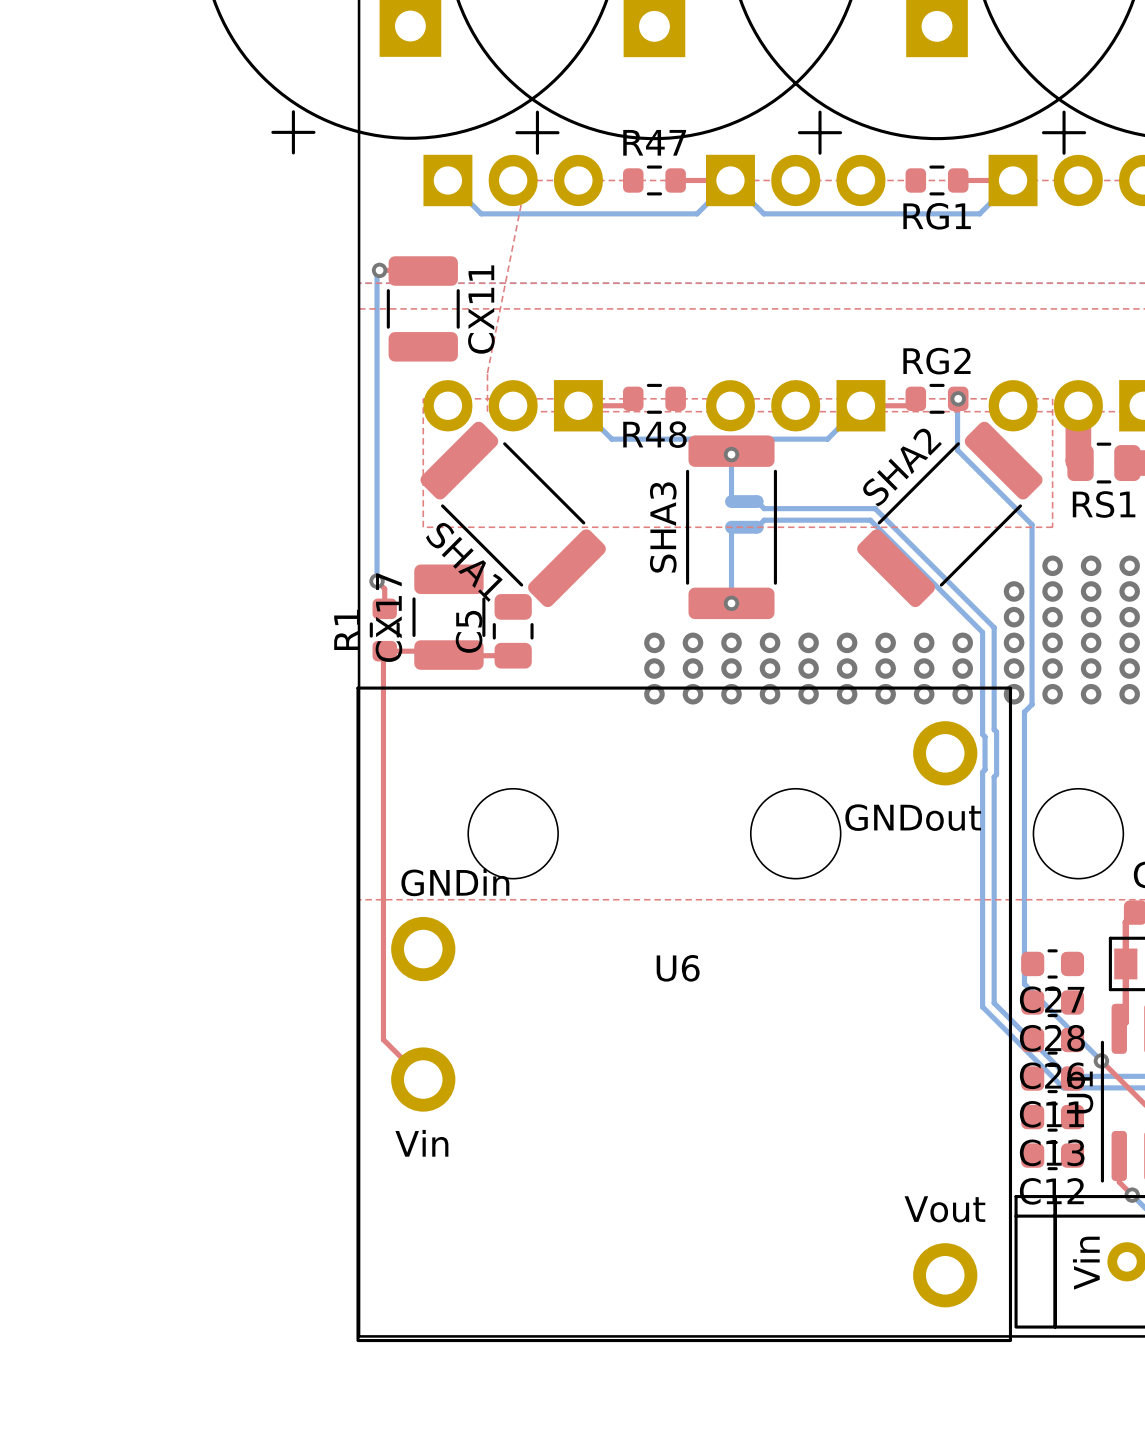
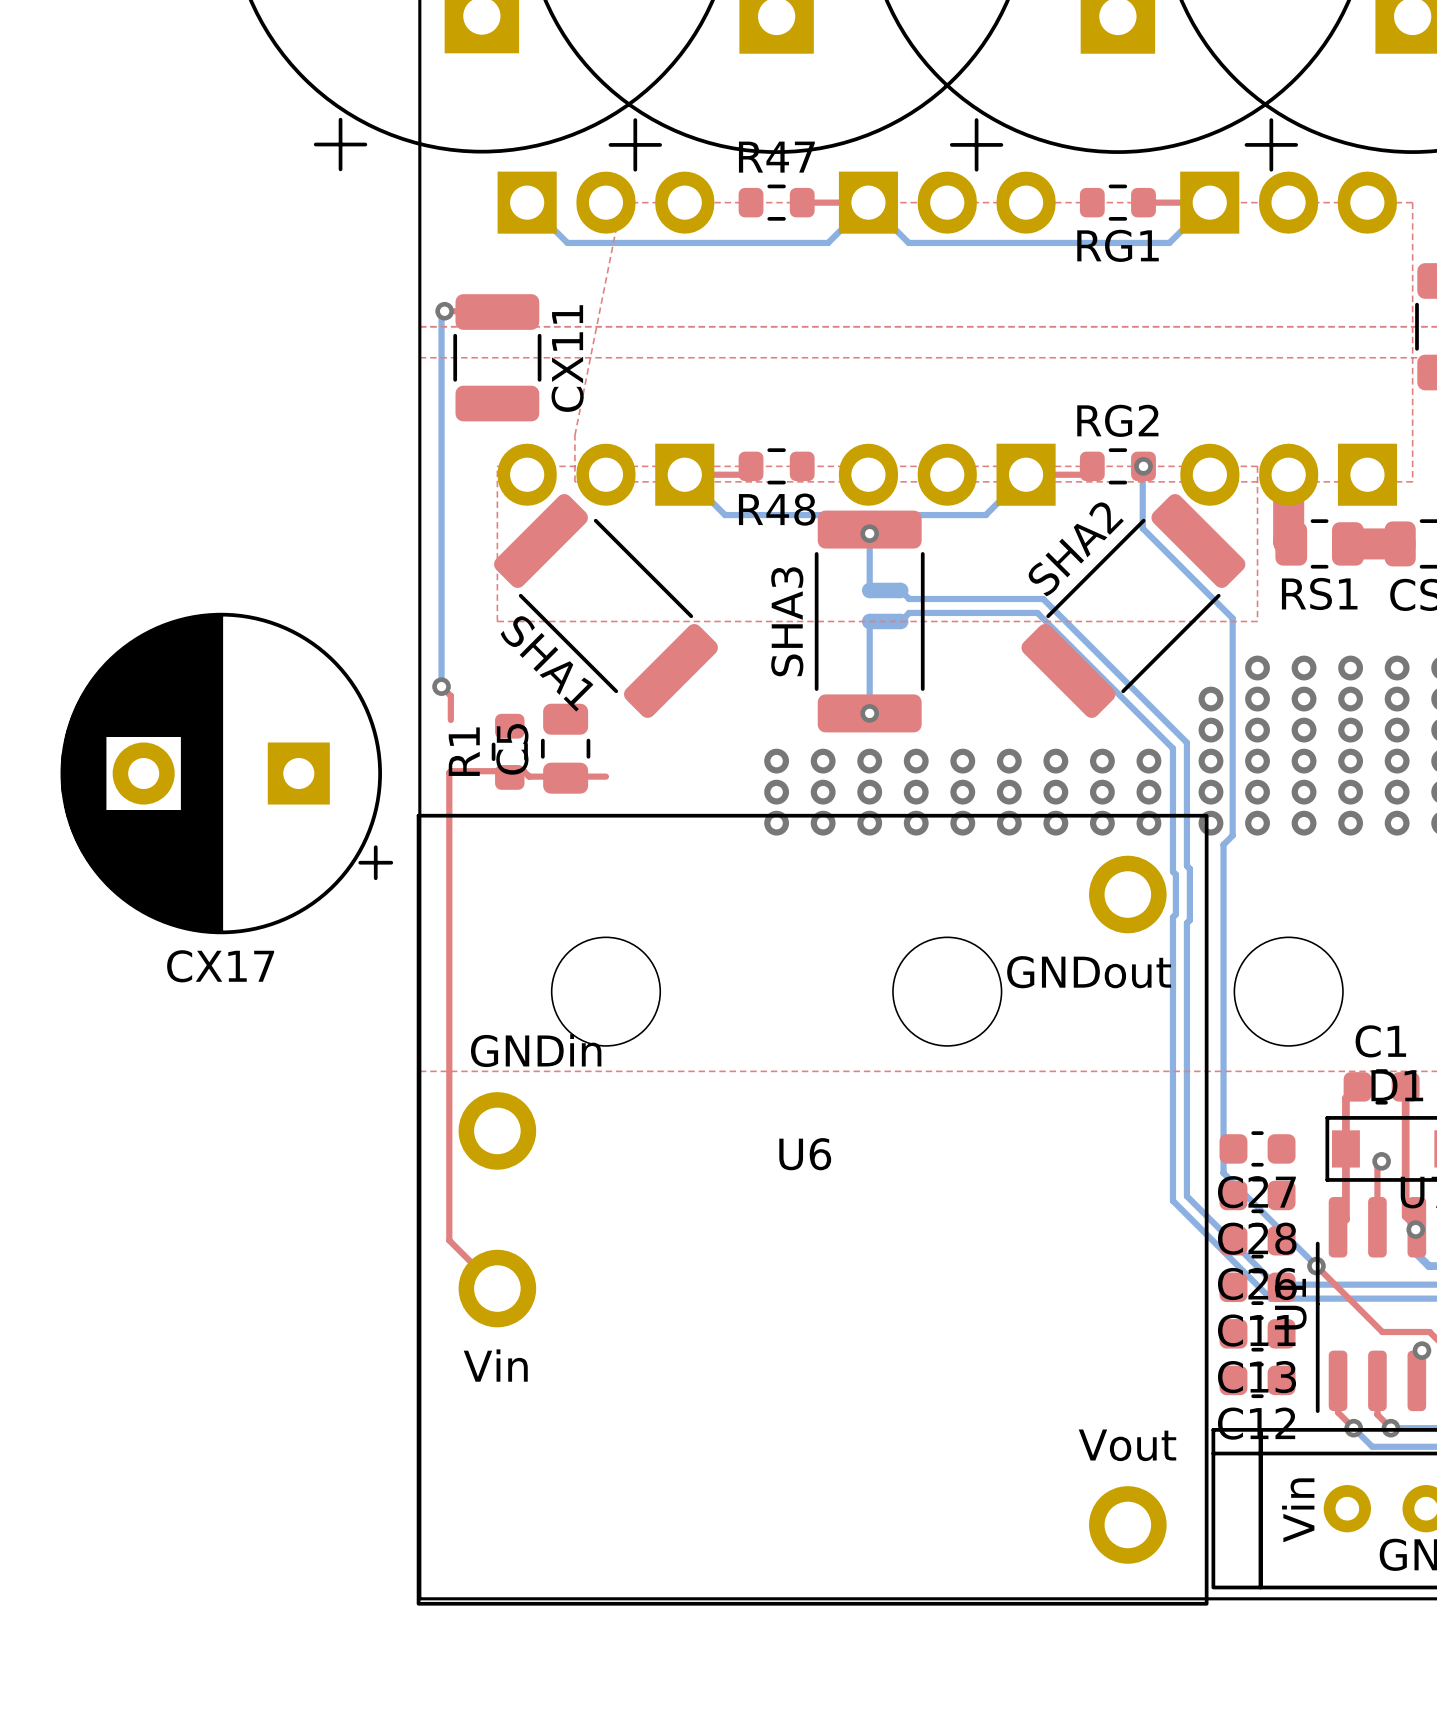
CX17 footprint: [412, 564, 486, 670] -> [60, 612, 394, 935]
CX17 name position: CX17 (388, 617) -> CX17 (220, 966)
R1 position: (384, 630) -> (509, 751)
C5 position: (513, 631) -> (565, 748)

